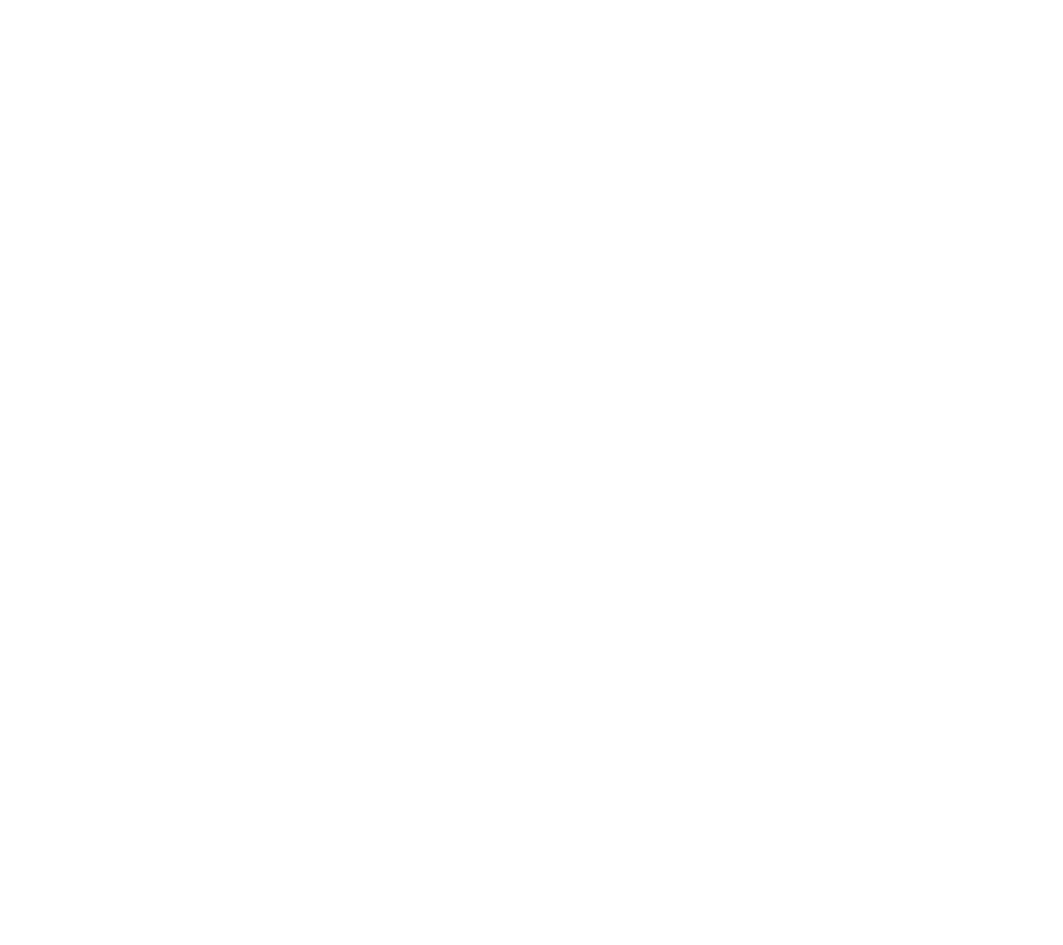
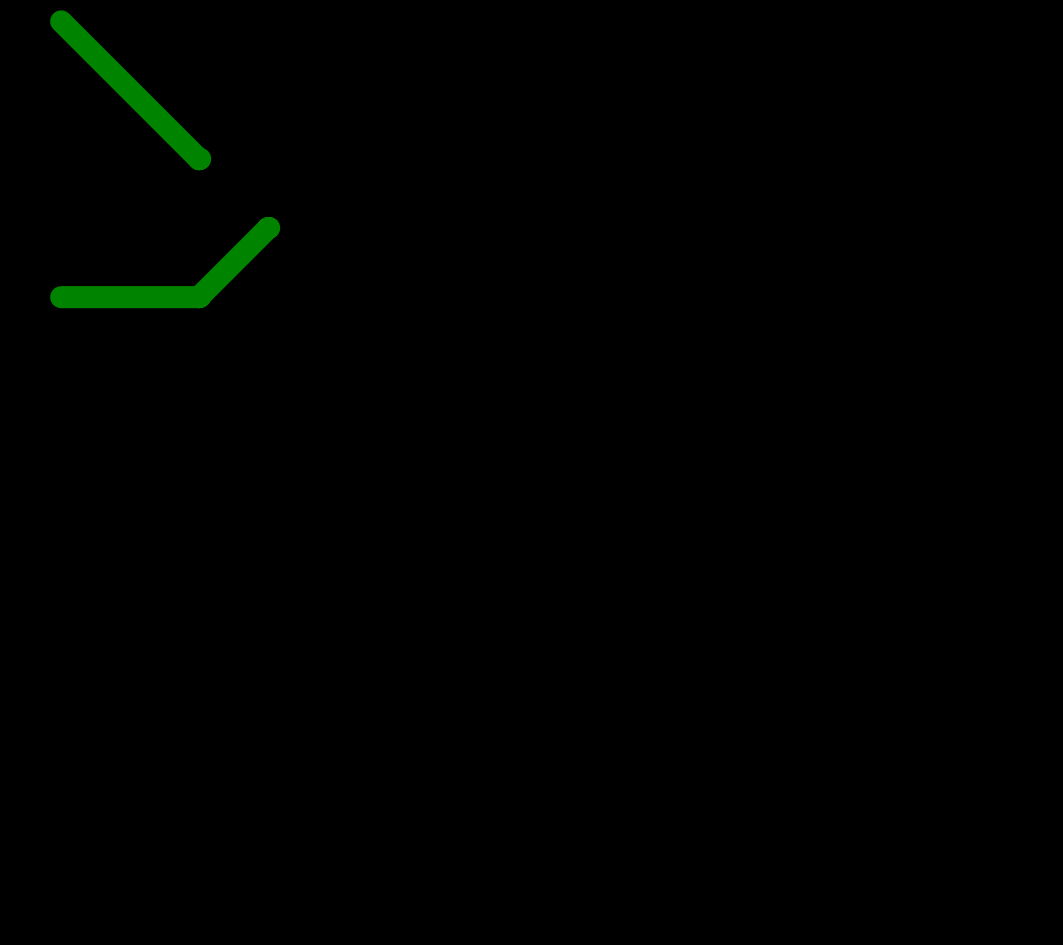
bottom track: none -> (61, 21) (200, 158)
bottom track: none -> (269, 227) (199, 297)
bottom track: none -> (199, 297) (61, 297)

